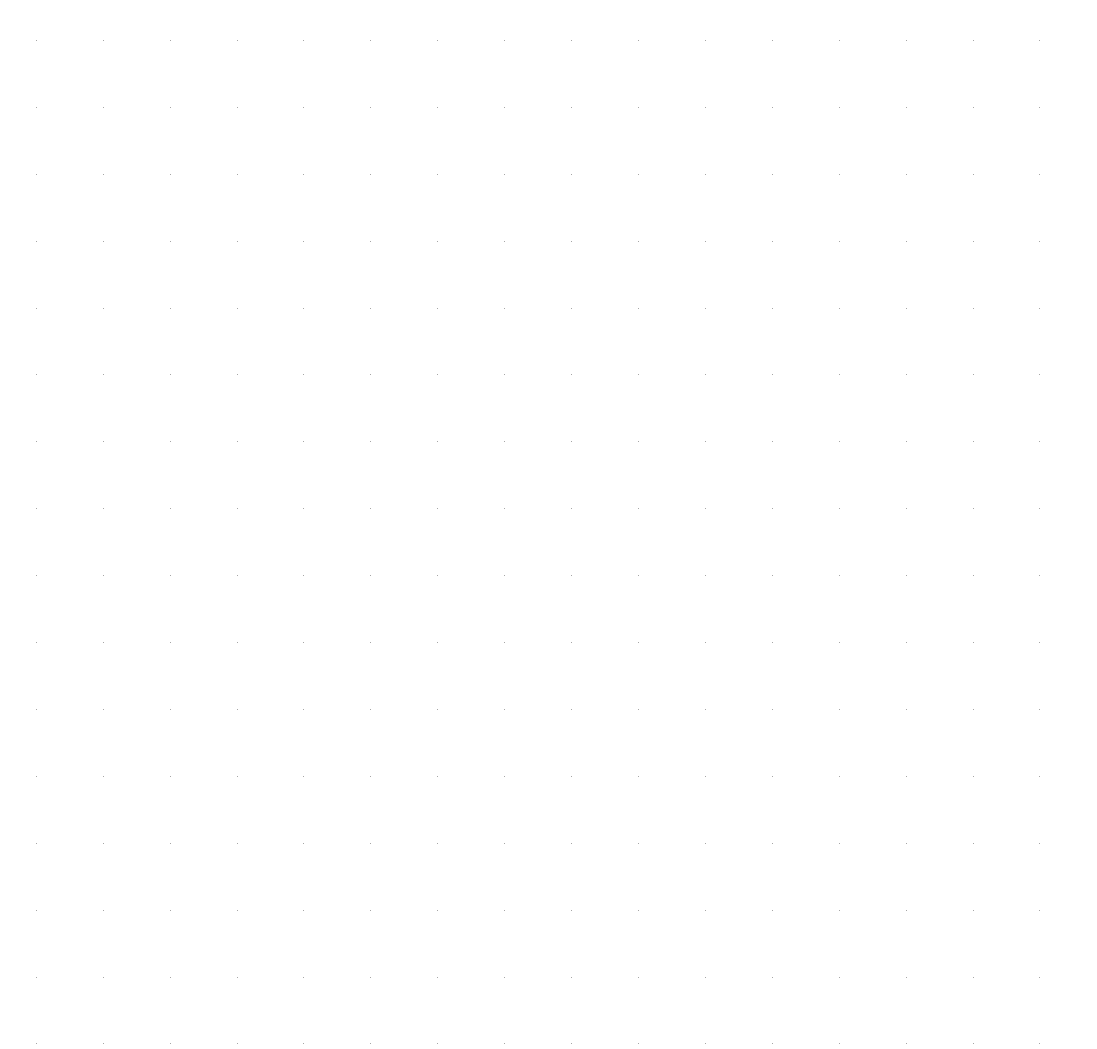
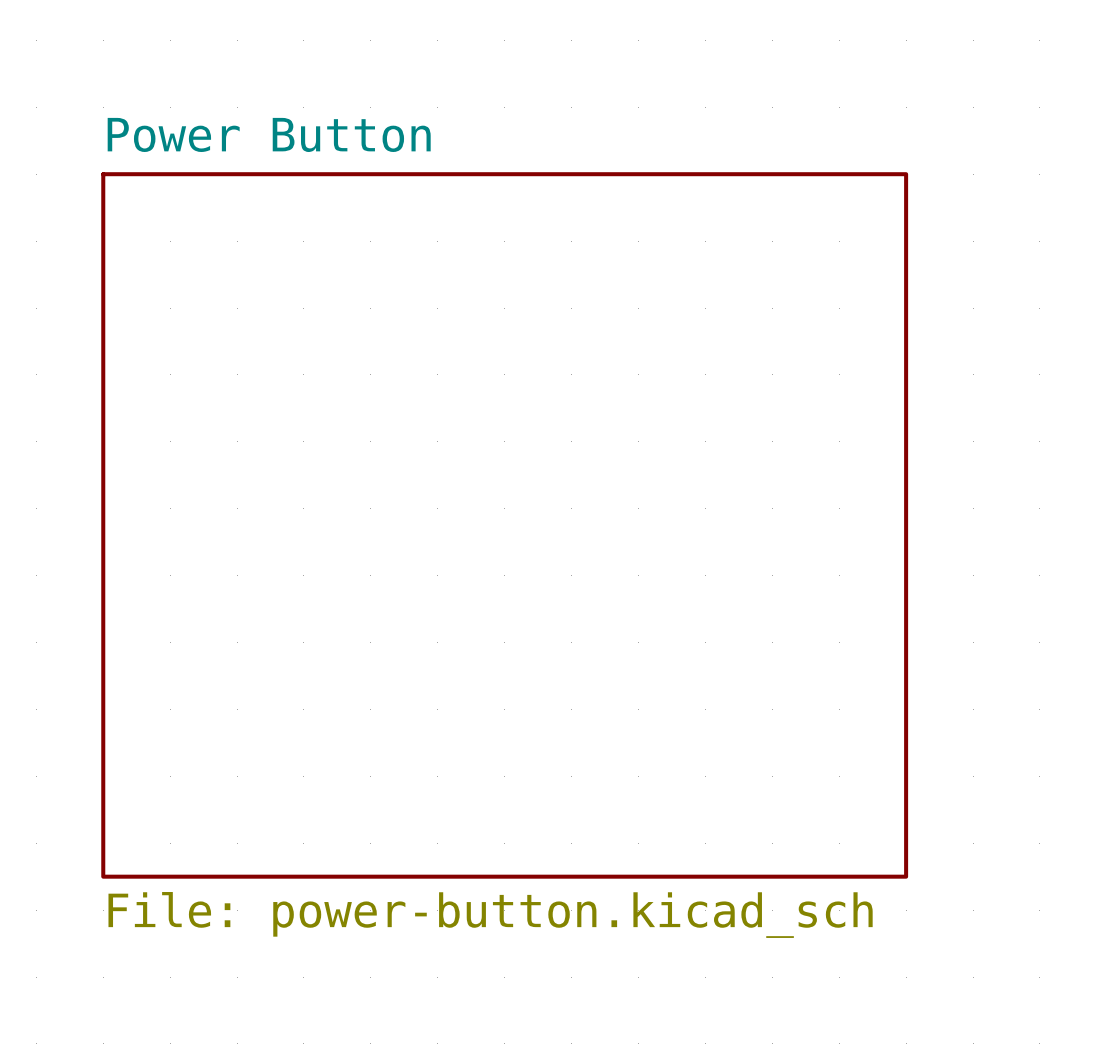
sheet Power Button: none -> File: power-button.kicad_sch (504, 525)

